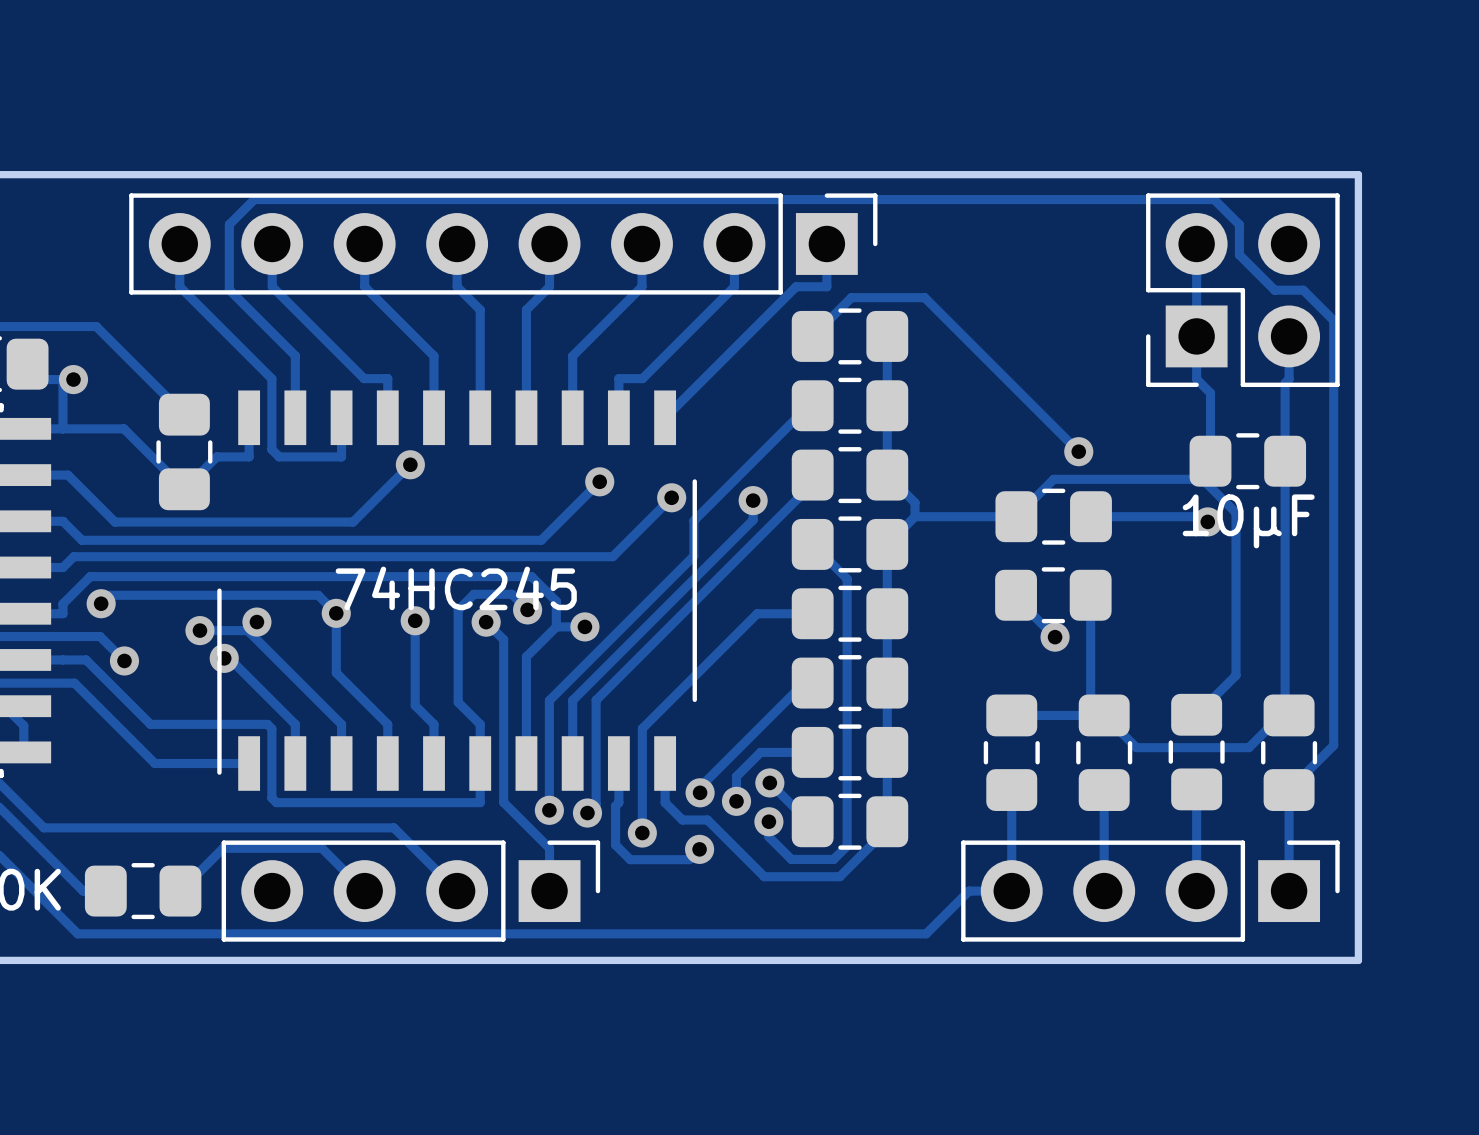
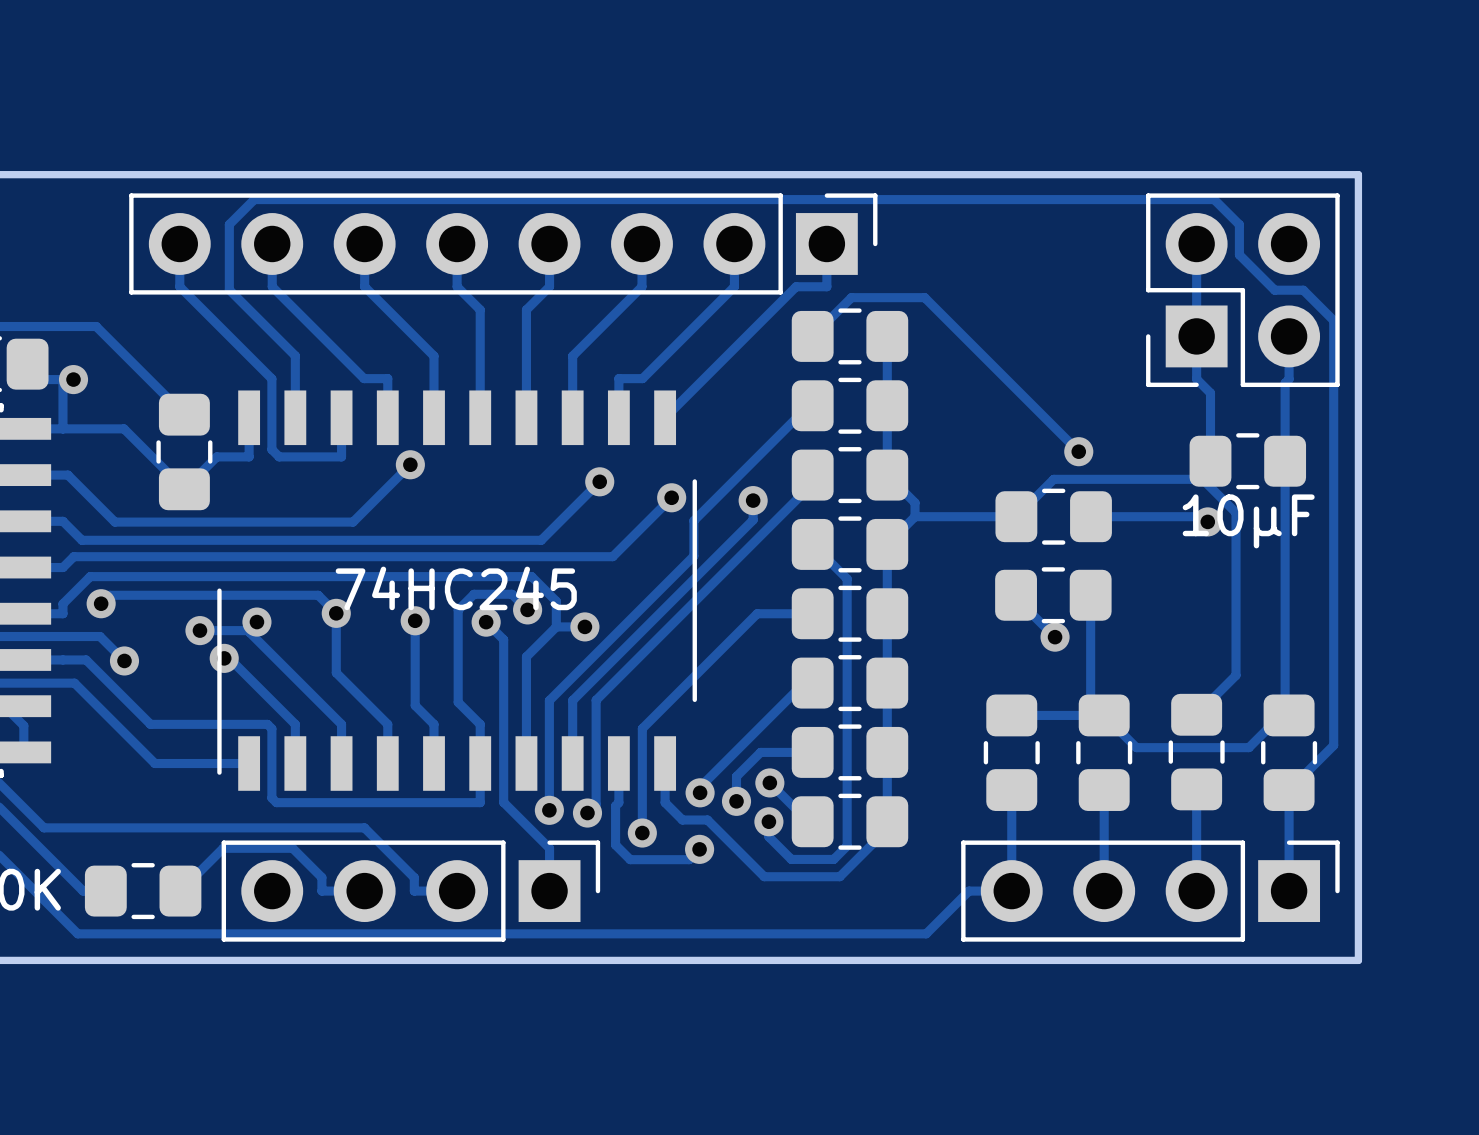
track: (364, 827) (393, 827) (457, 891) -> (364, 827) (414, 877) (414, 891) (457, 891)
track: (292, 848) (321, 848) (364, 891) -> (292, 848) (321, 877) (321, 891) (364, 891)

